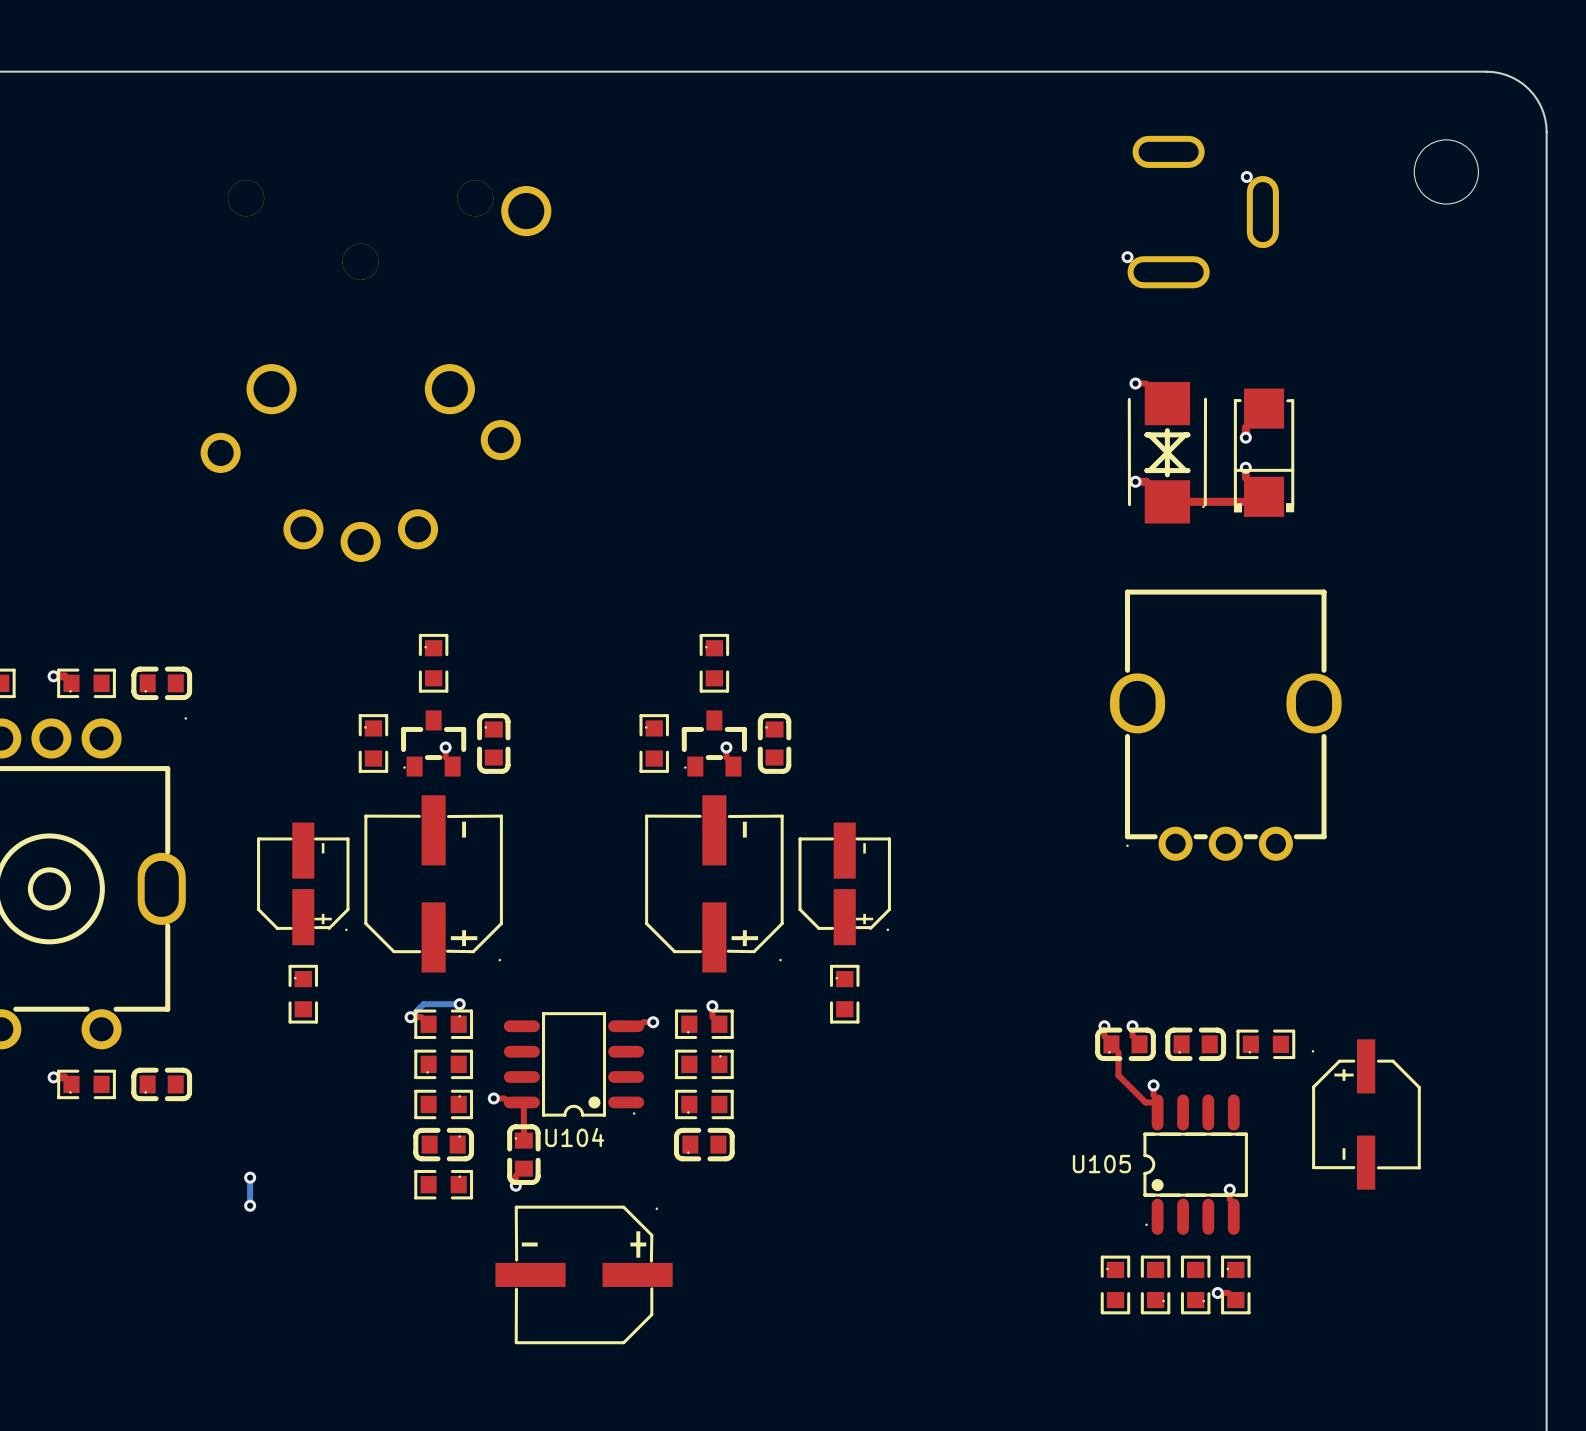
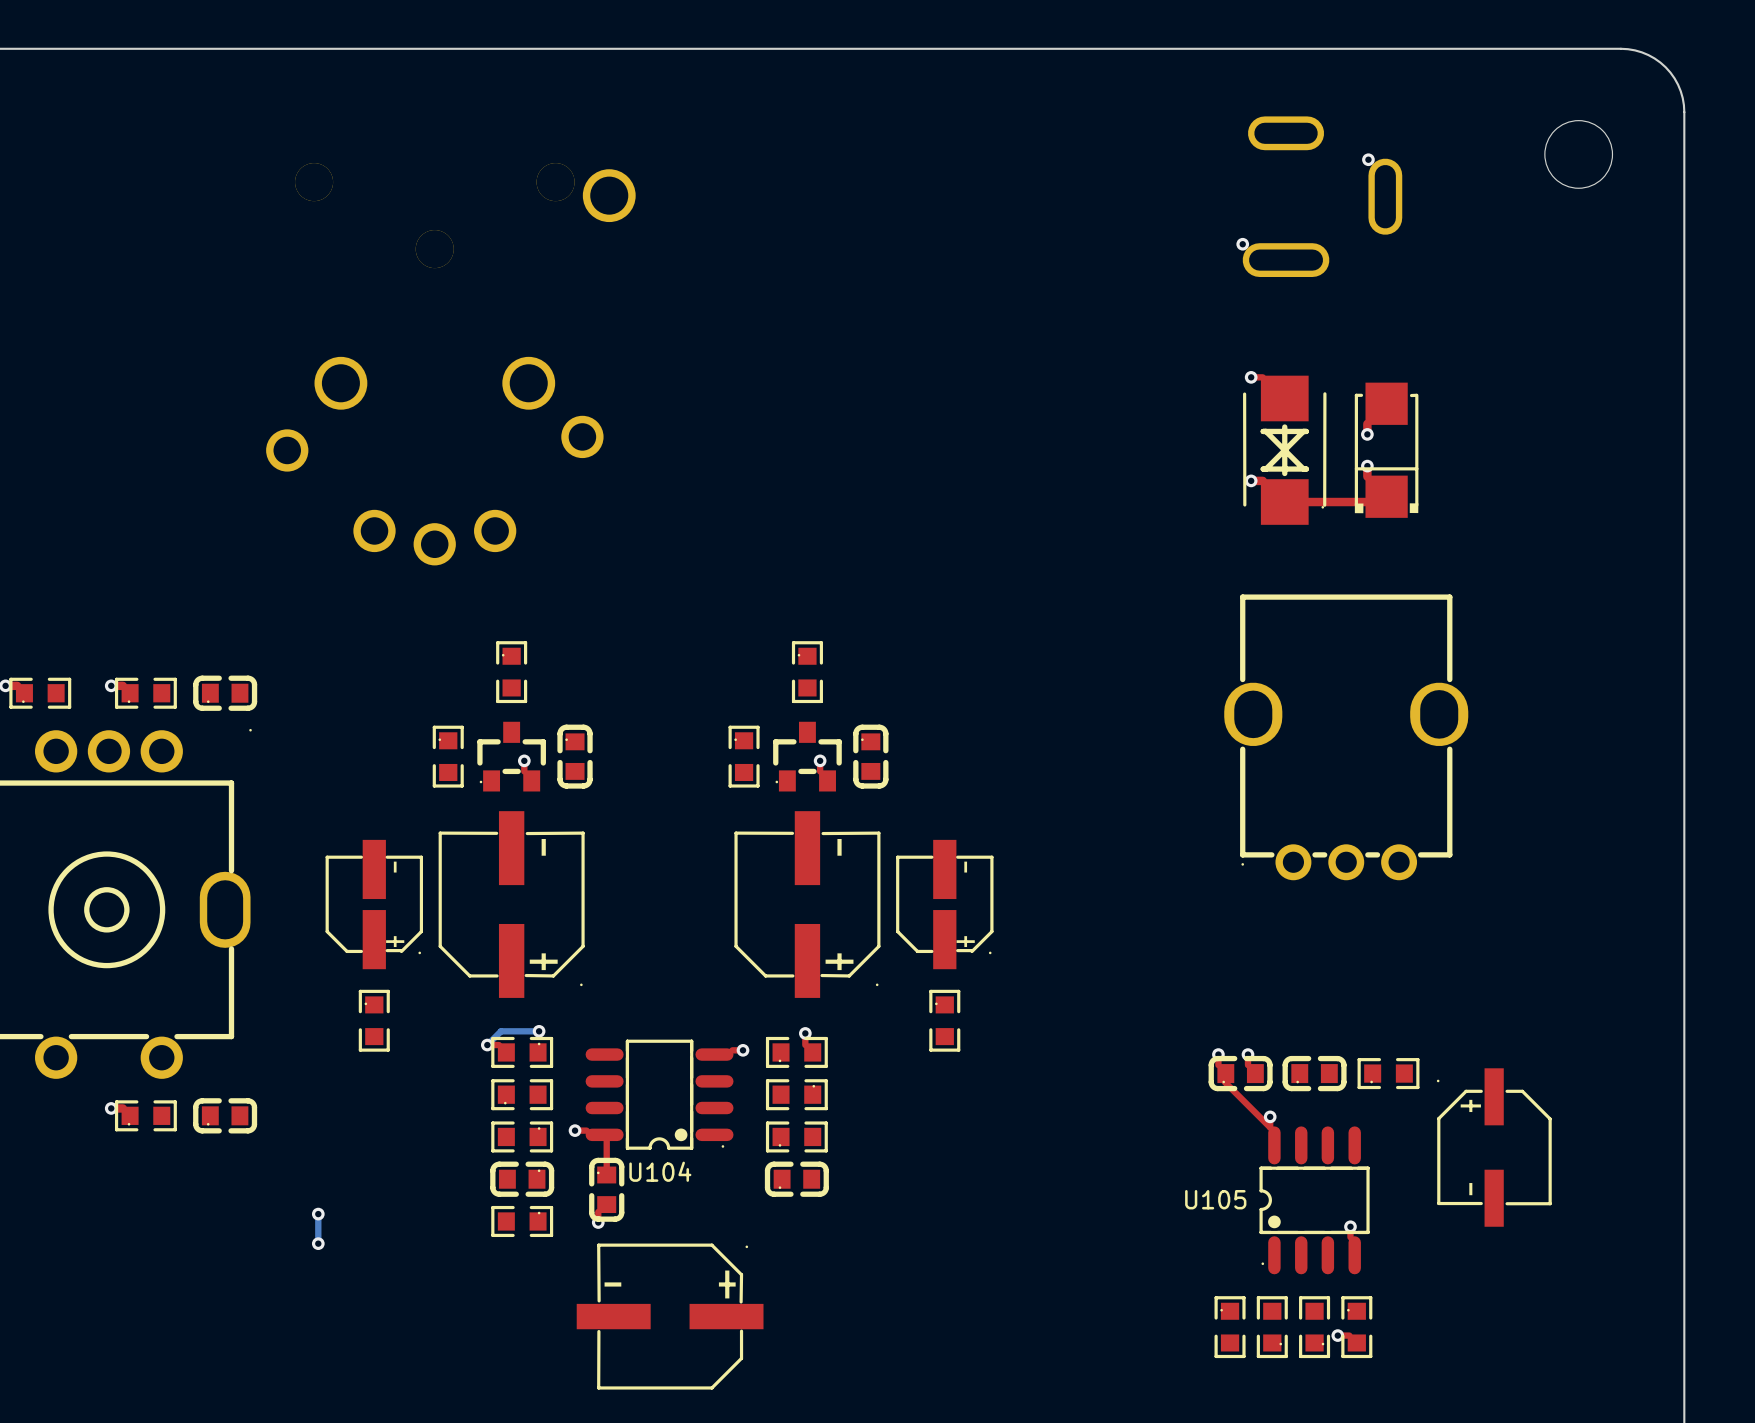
top track: none -> (1224, 1082) (1270, 1127)
top track: (1118, 1052) (1118, 1075) (1145, 1102) (1153, 1102) -> none

